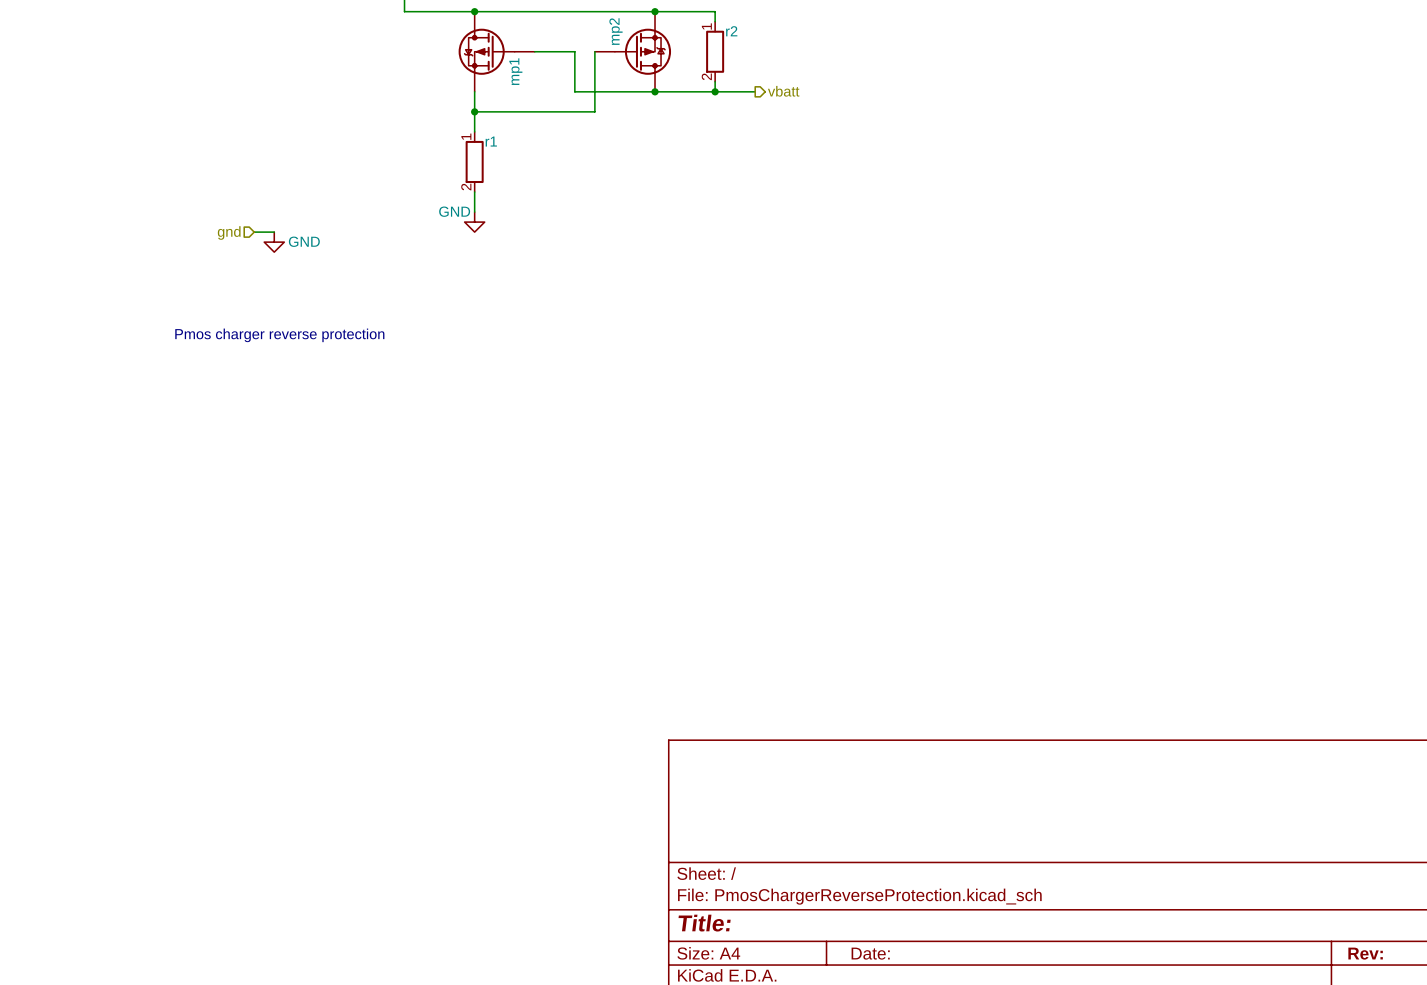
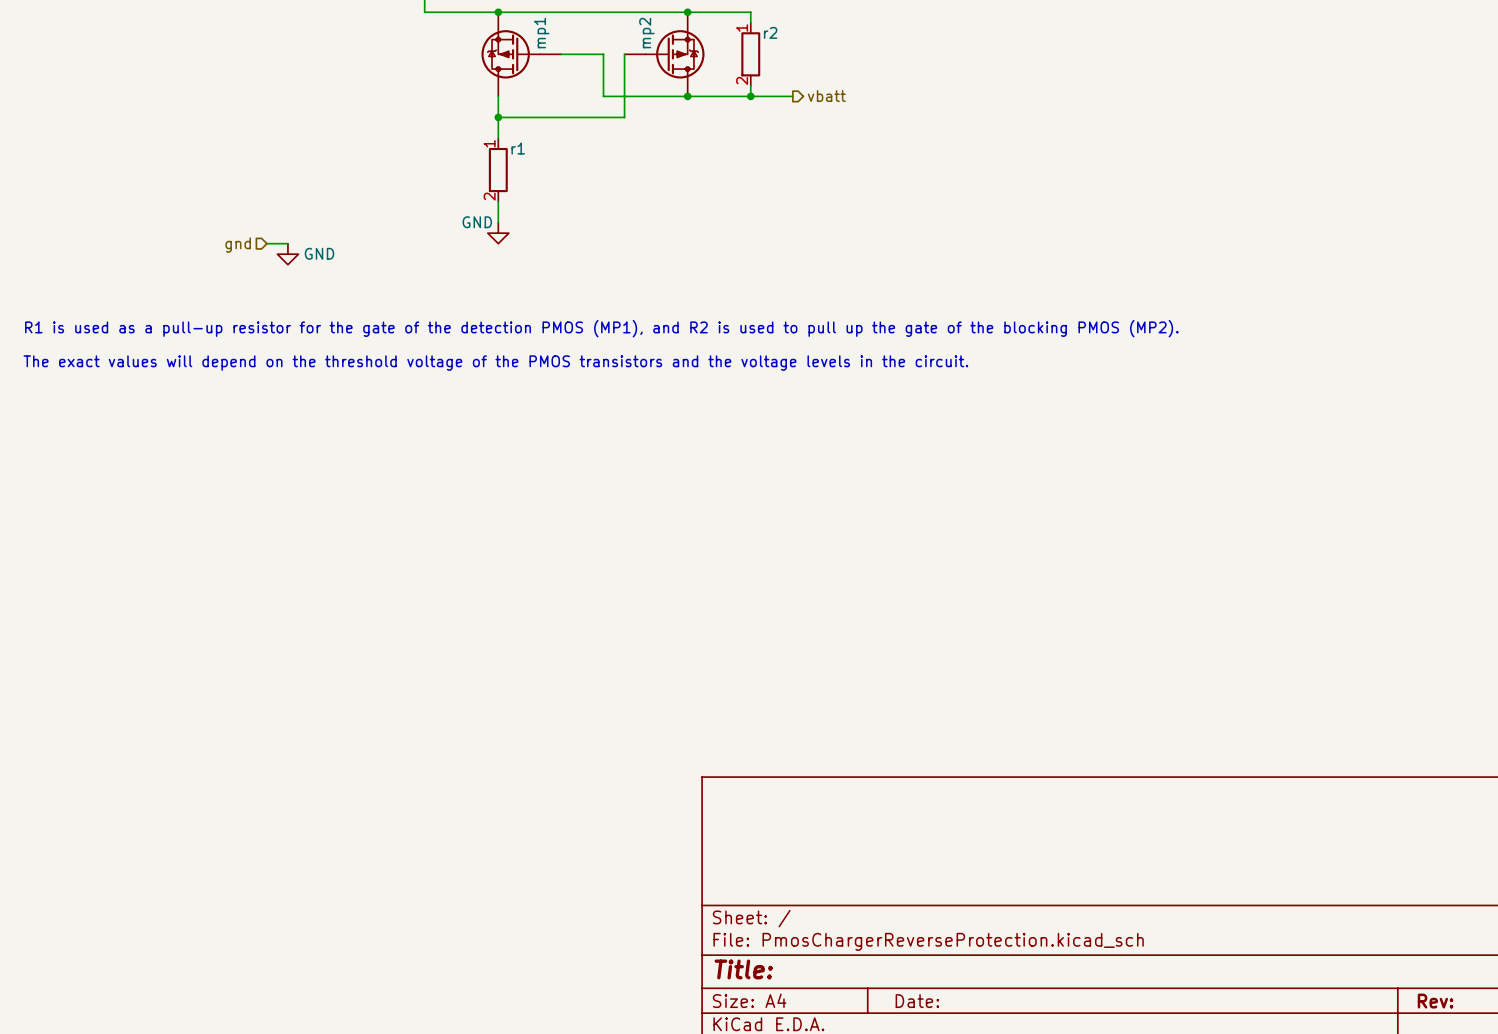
mp1 flip: as is (486, 51) -> up-down (510, 54)
text: none -> R1 is used as a pull-up resistor for the gate of the detection PMOS (MP1), and R2 is used to pull up the gate of the blocking PMOS (MP2). (601, 328)
text: Pmos charger reverse protection (279, 335) -> none
text: none -> The exact values will depend on the threshold voltage of the PMOS transistors and the voltage levels in the circuit. (495, 363)

